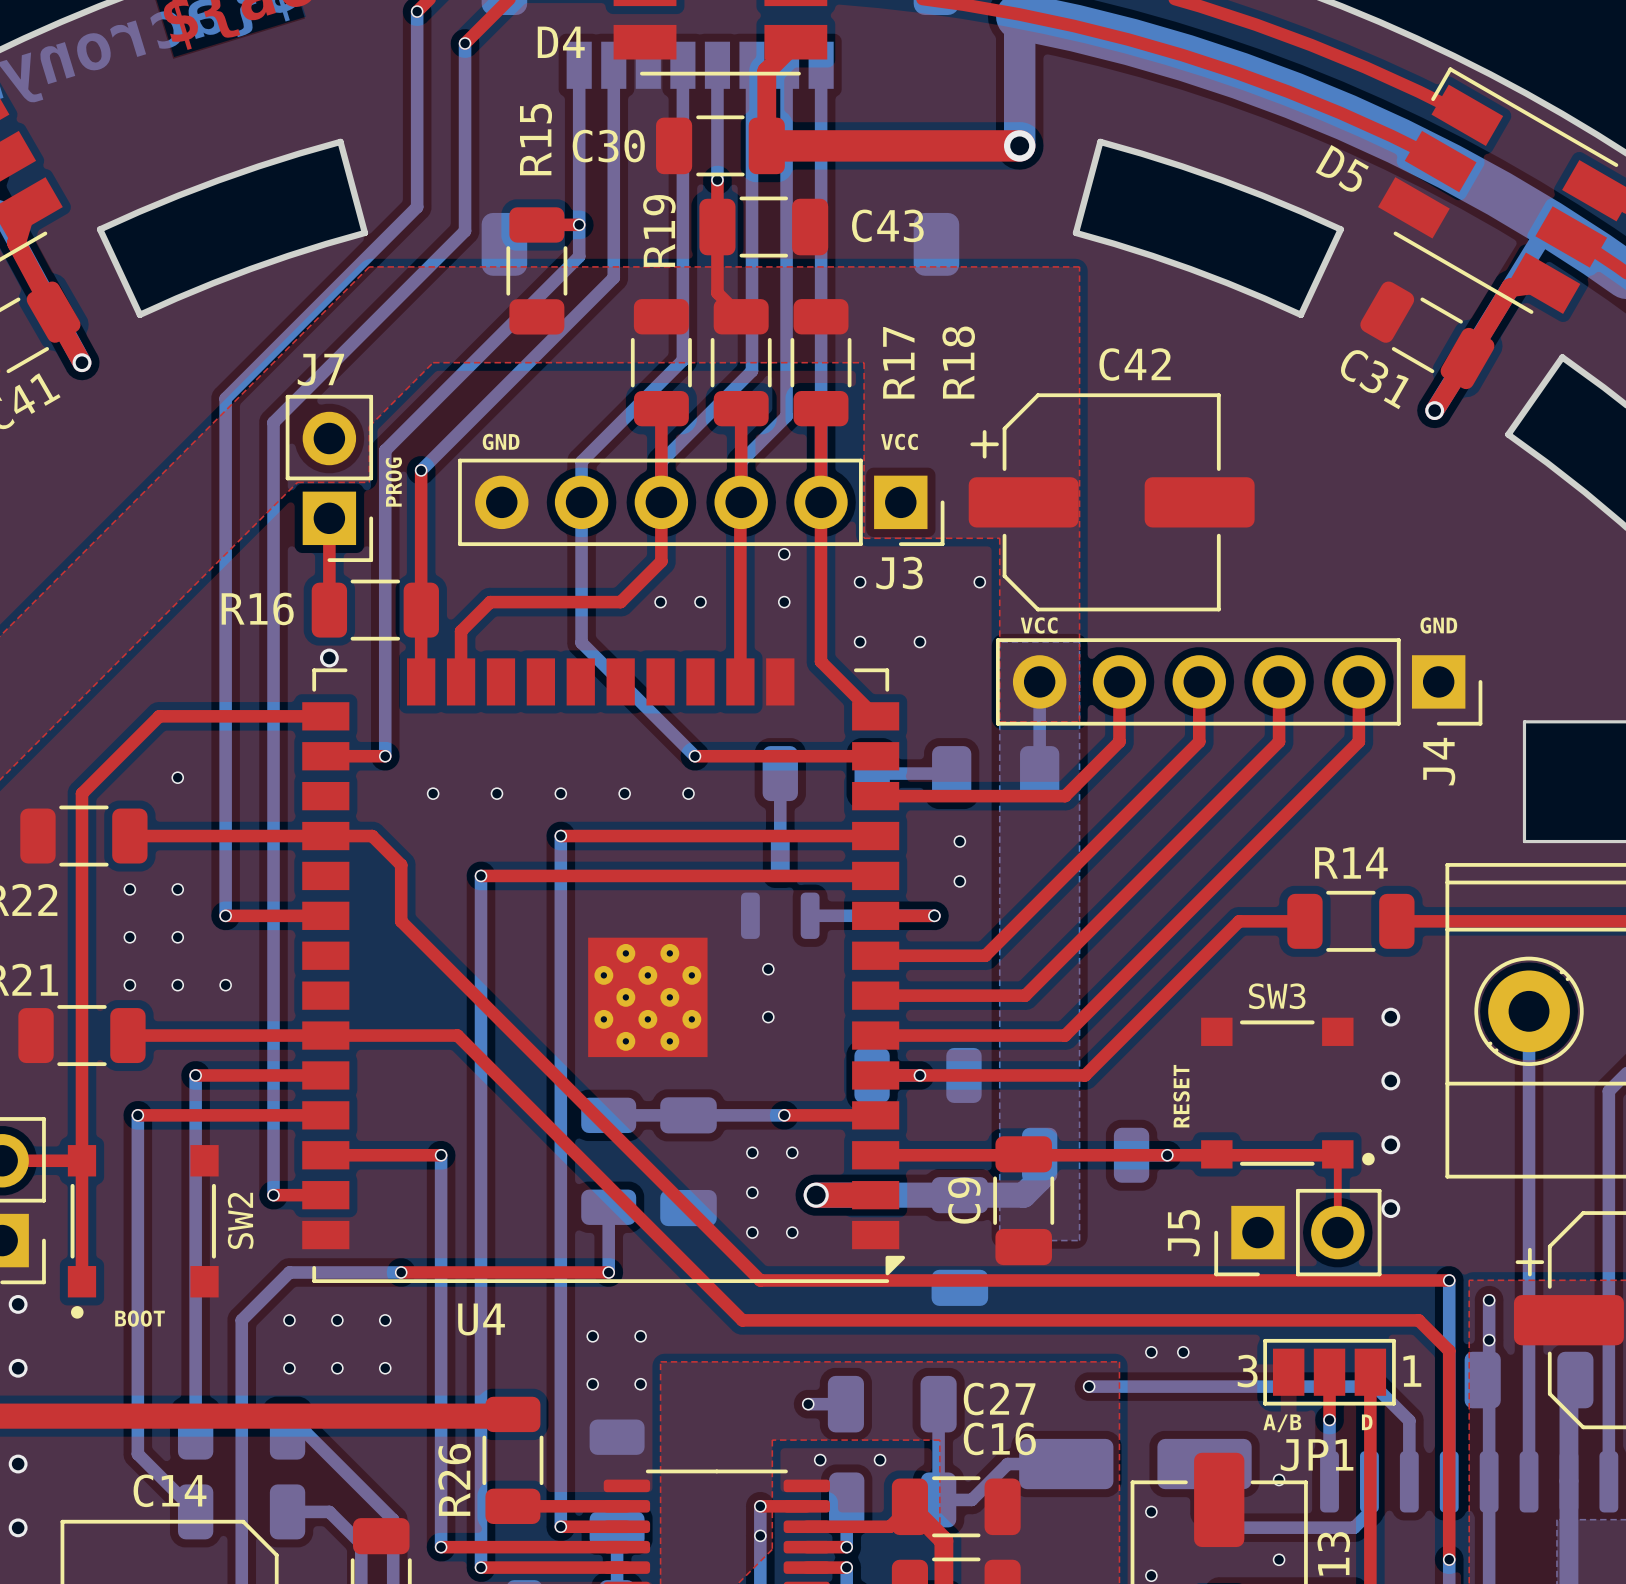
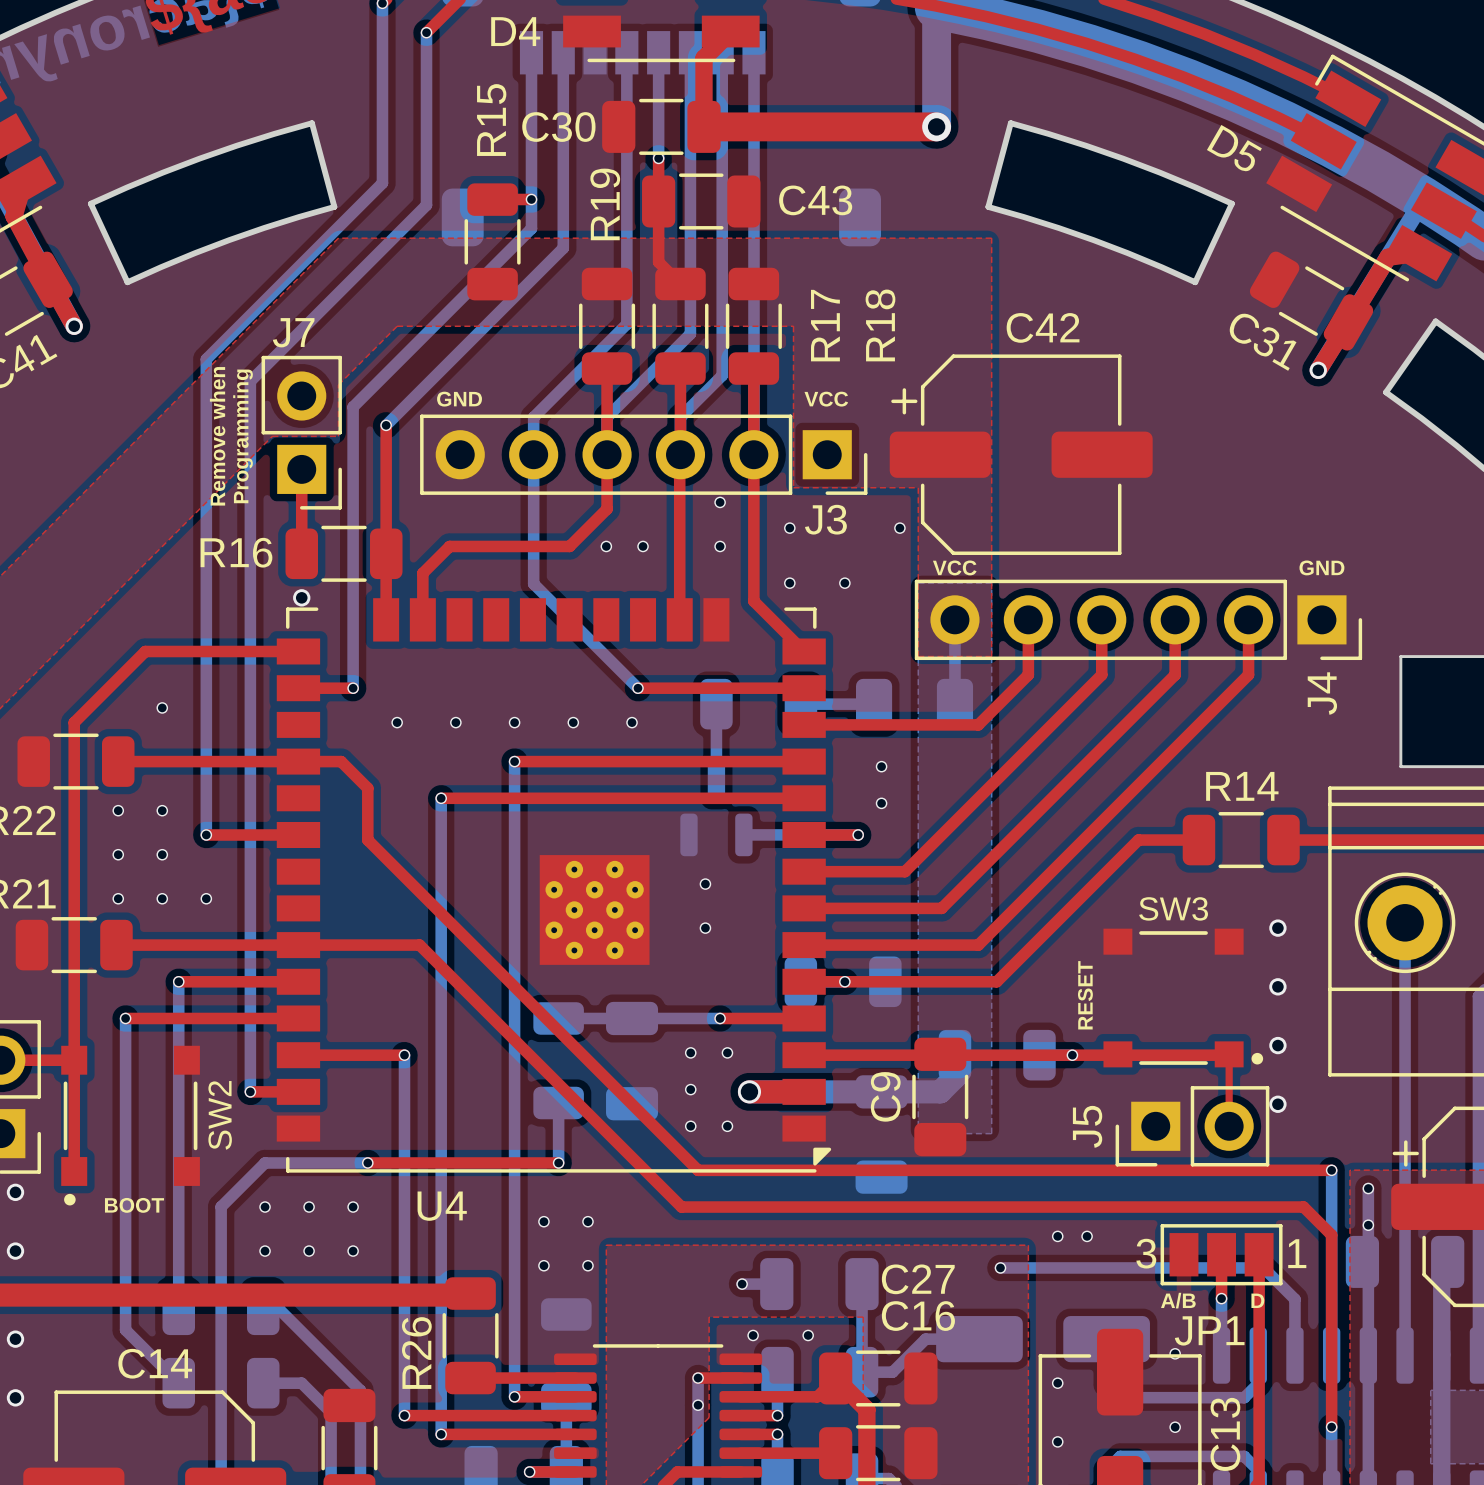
text: none -> Remove when (217, 436)
text: none -> Programming (243, 436)
text: PROG (393, 482) -> none

